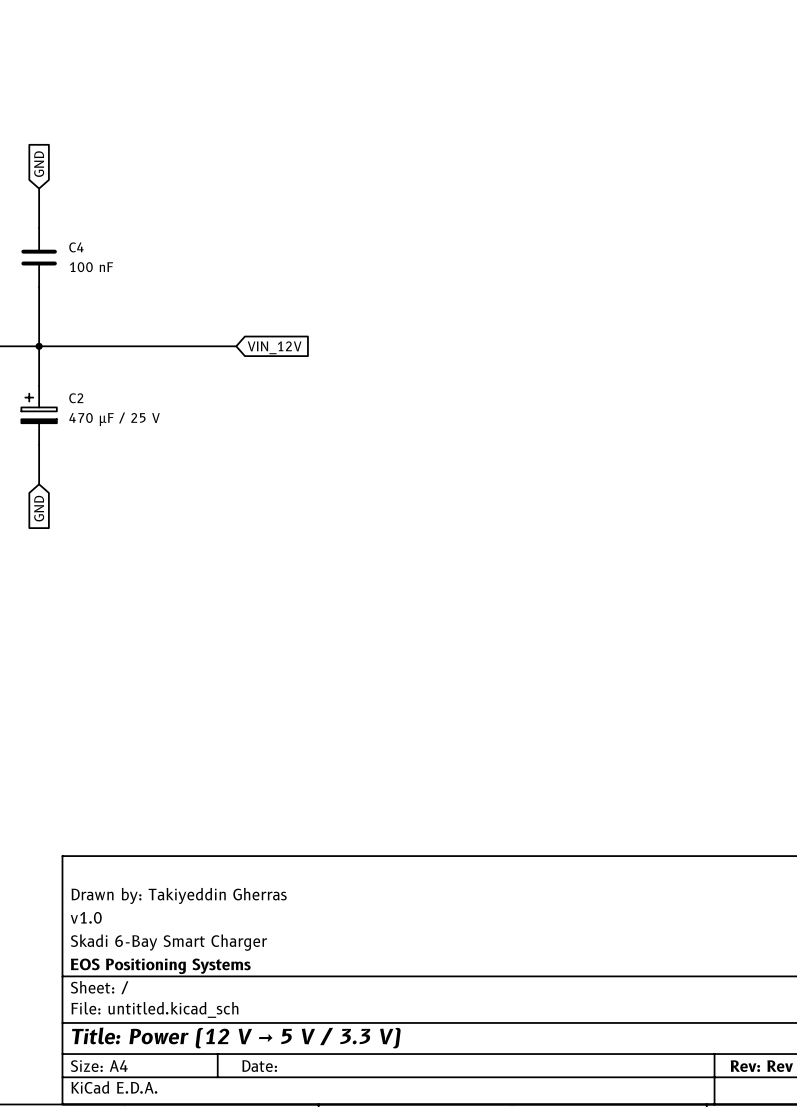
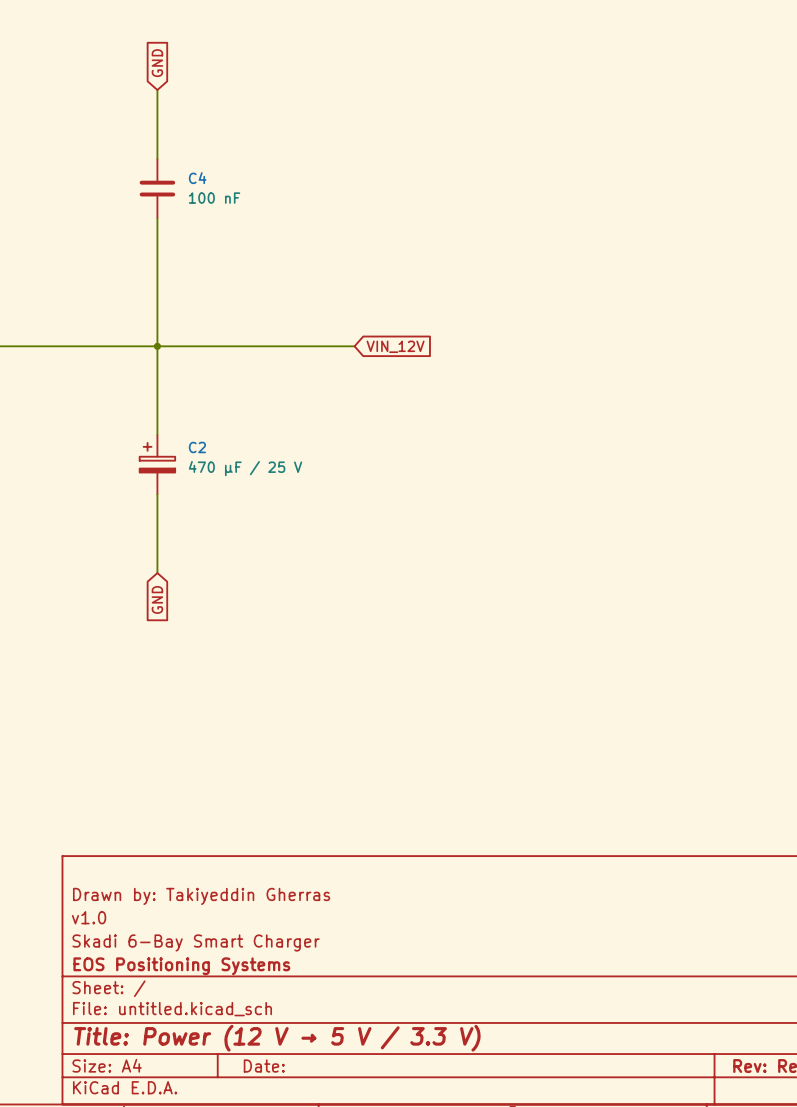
global label: none -> GND (157, 63)
wire: none -> (157, 89) (157, 159)
global label: GND (39, 164) -> none
wire: (39, 188) (39, 228) -> none
wire: none -> (157, 218) (157, 435)
C4 position: (39, 257) -> (157, 188)
wire: (39, 287) (39, 385) -> none
junction: (39, 346) -> none
junction: none -> (157, 346)
wire: none -> (236, 346) (354, 346)
global label position: VIN_12V (274, 347) -> VIN_12V (395, 346)
C2 position: (39, 415) -> (157, 464)
wire: (39, 444) (39, 484) -> none
wire: none -> (157, 494) (157, 573)
global label: GND (39, 508) -> none
global label: none -> GND (157, 599)

